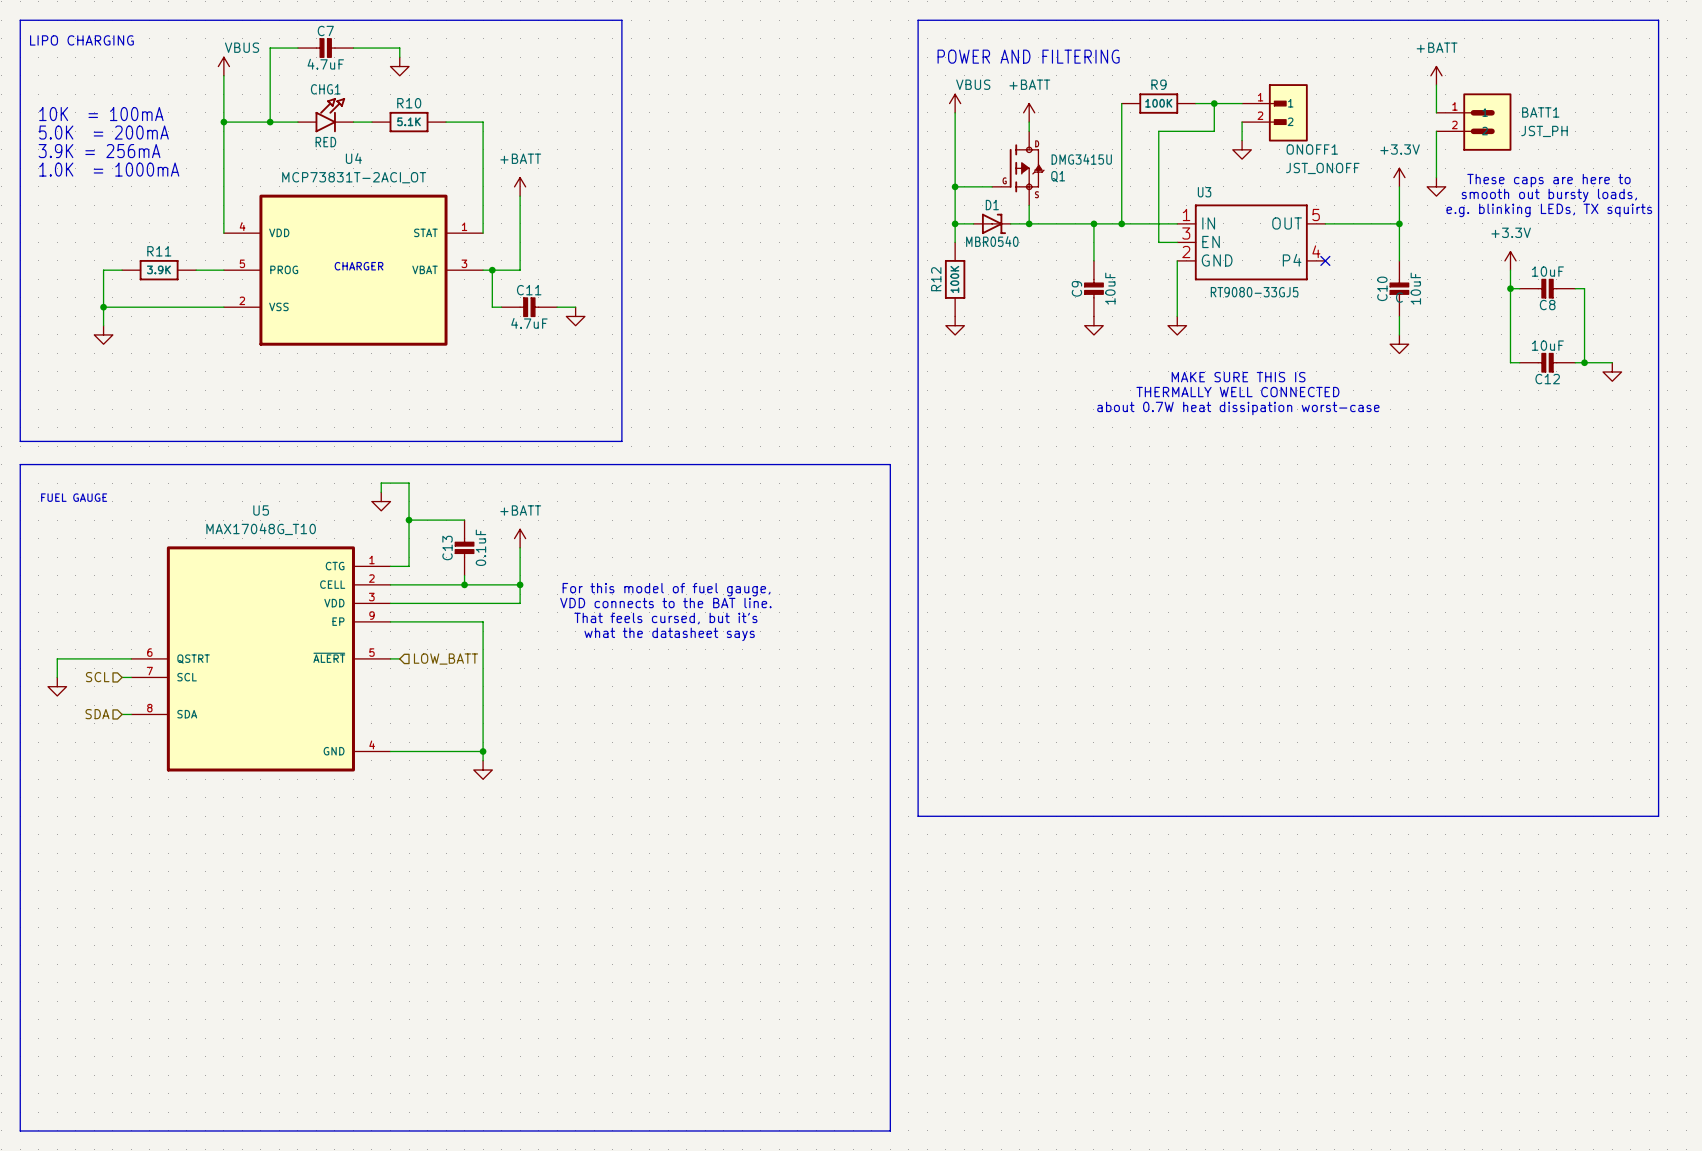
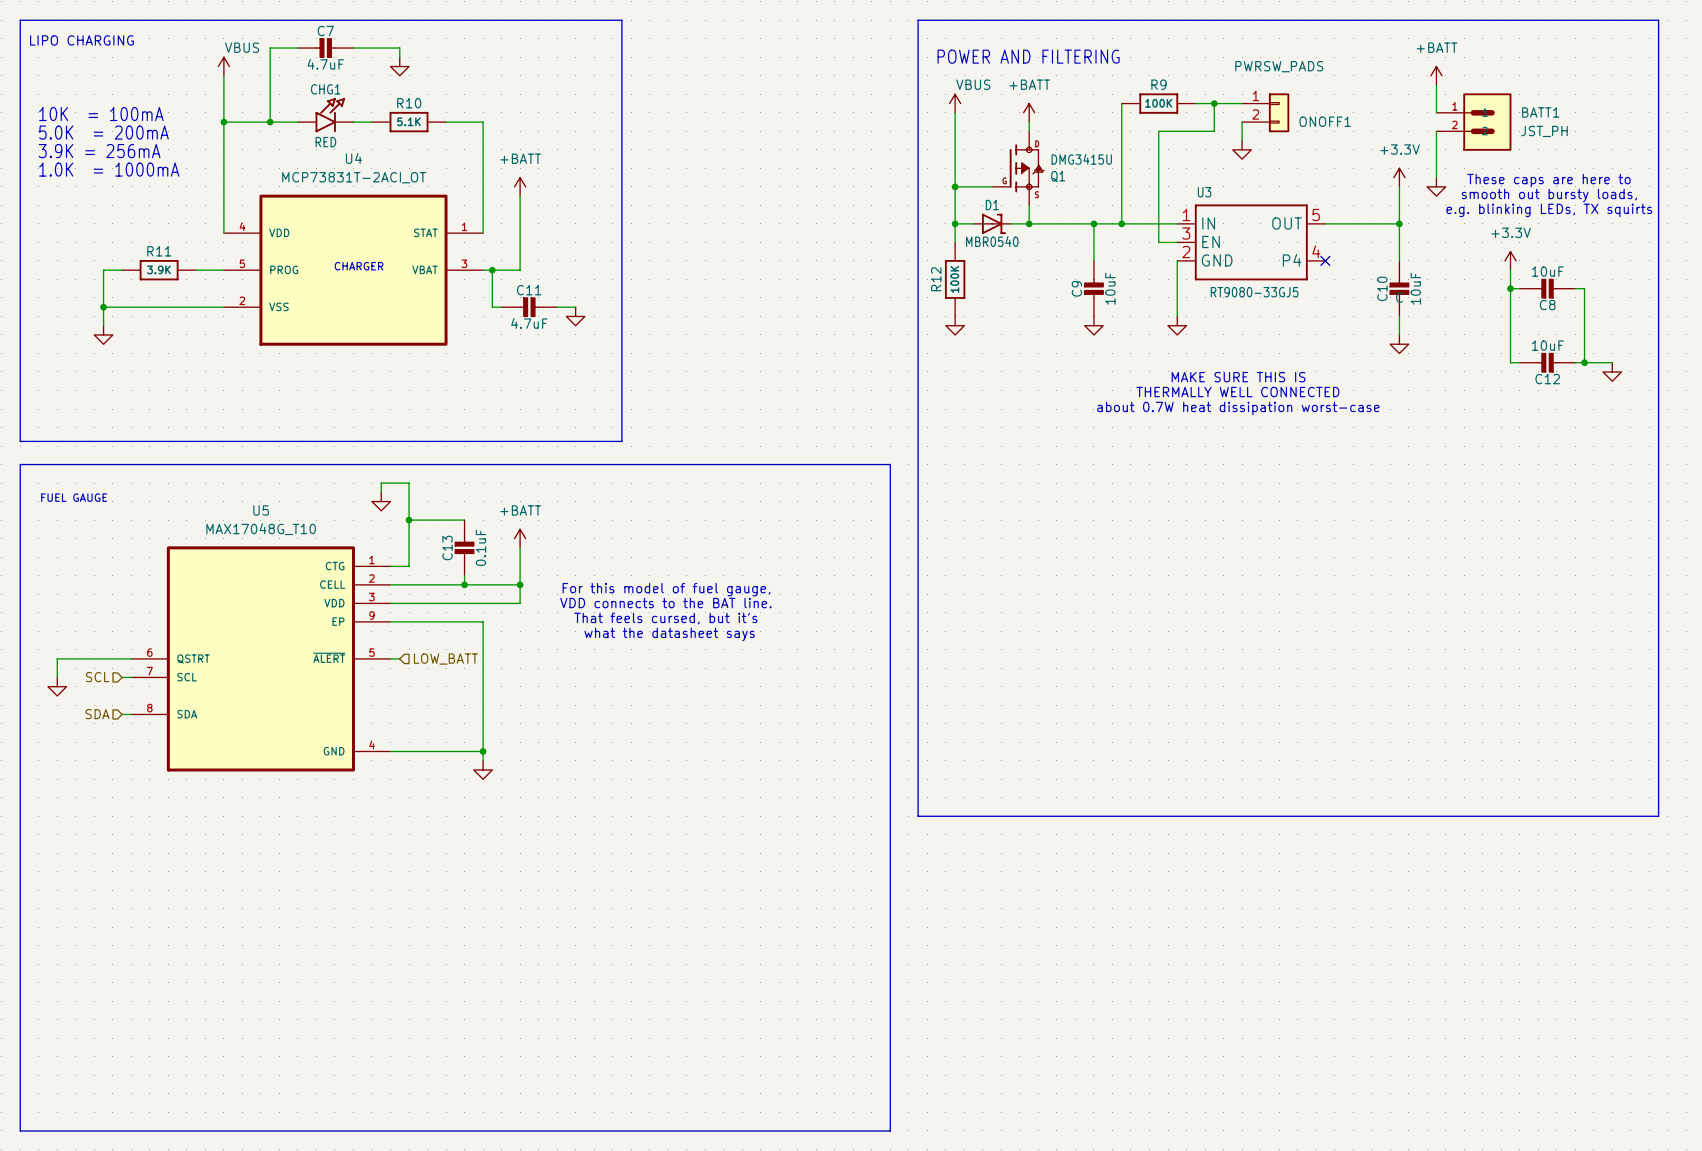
ONOFF1 symbol: [1242, 84, 1308, 142] -> [1242, 93, 1290, 133]
ONOFF1 name position: ONOFF1 (1312, 149) -> ONOFF1 (1325, 121)
ONOFF1 value: JST_ONOFF (1322, 168) -> PWRSW_PADS (1279, 66)

